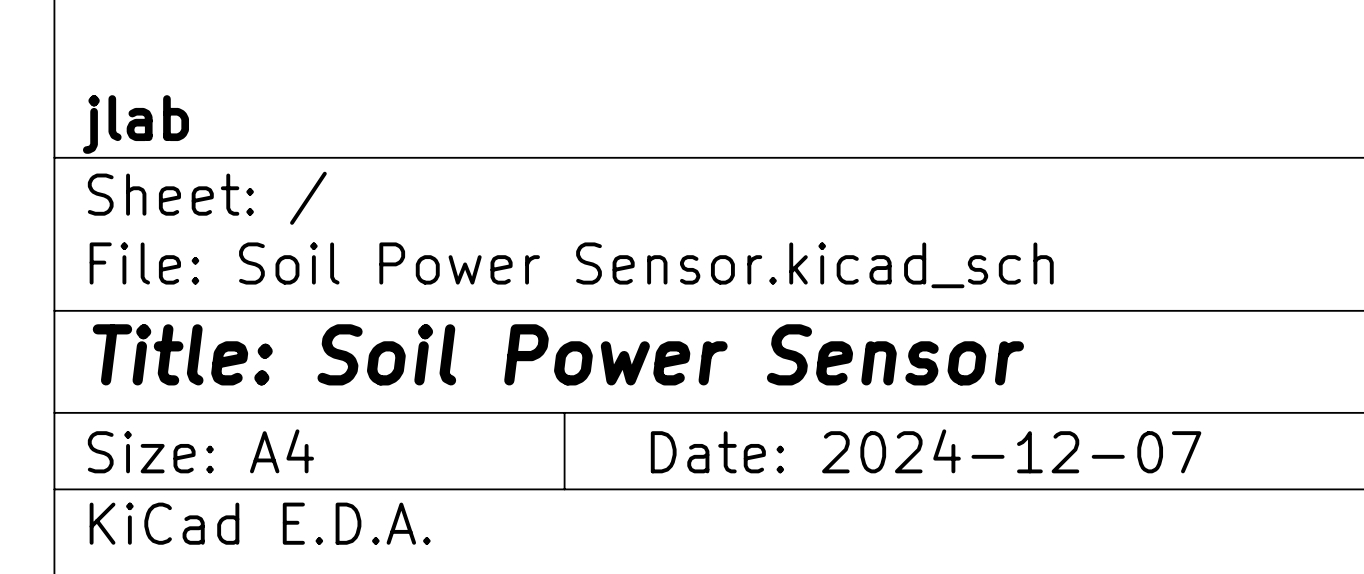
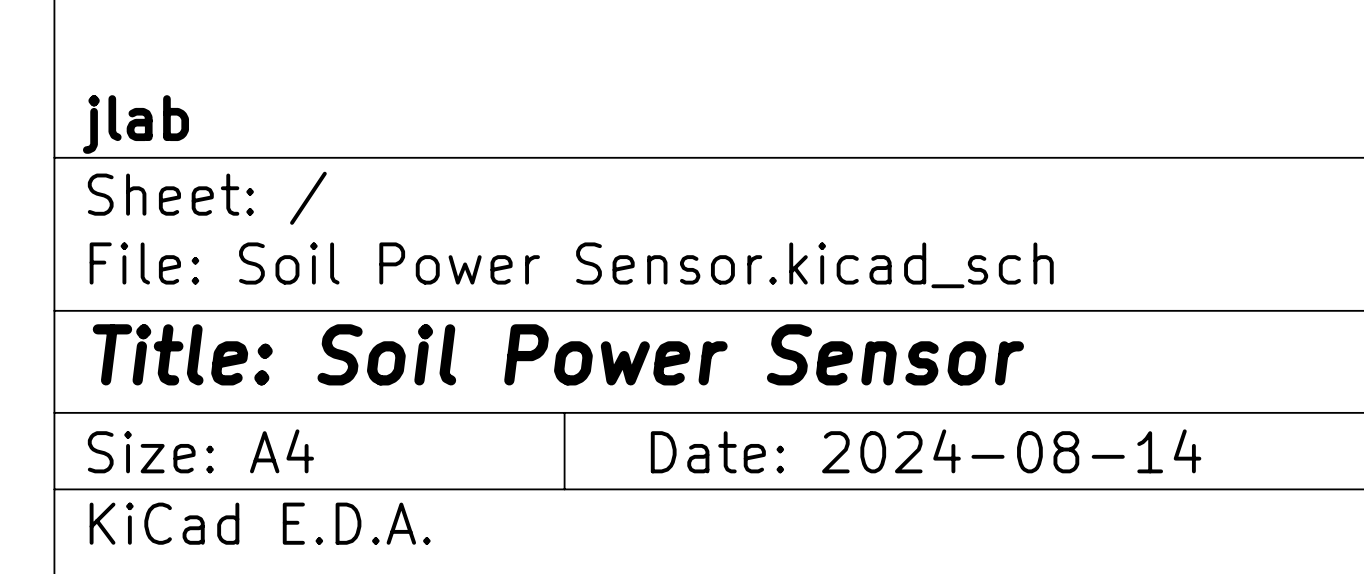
title block: Date: 2024-12-07 (926, 451) -> Date: 2024-08-14 (926, 451)

